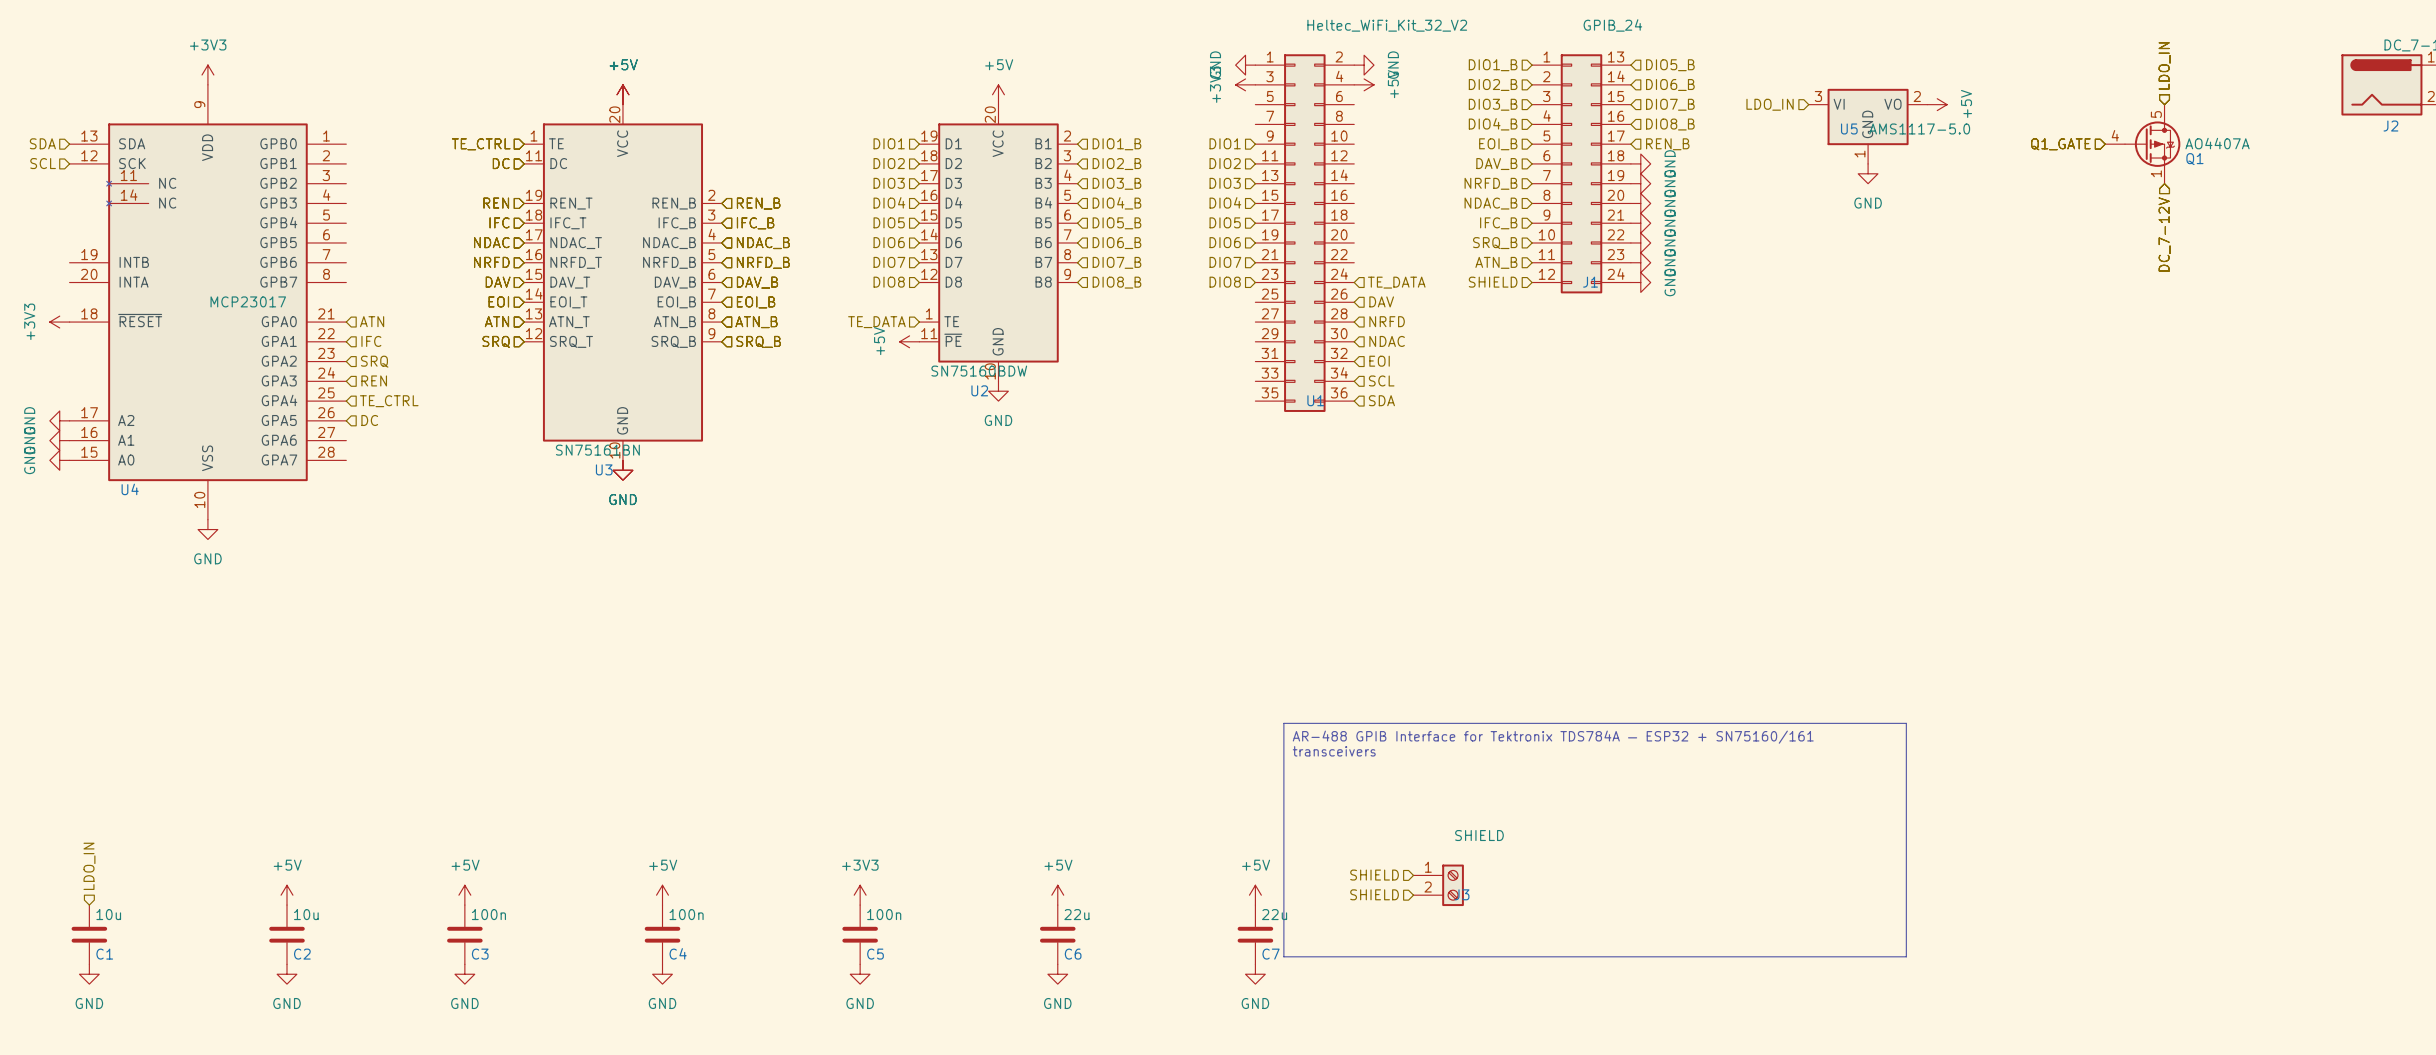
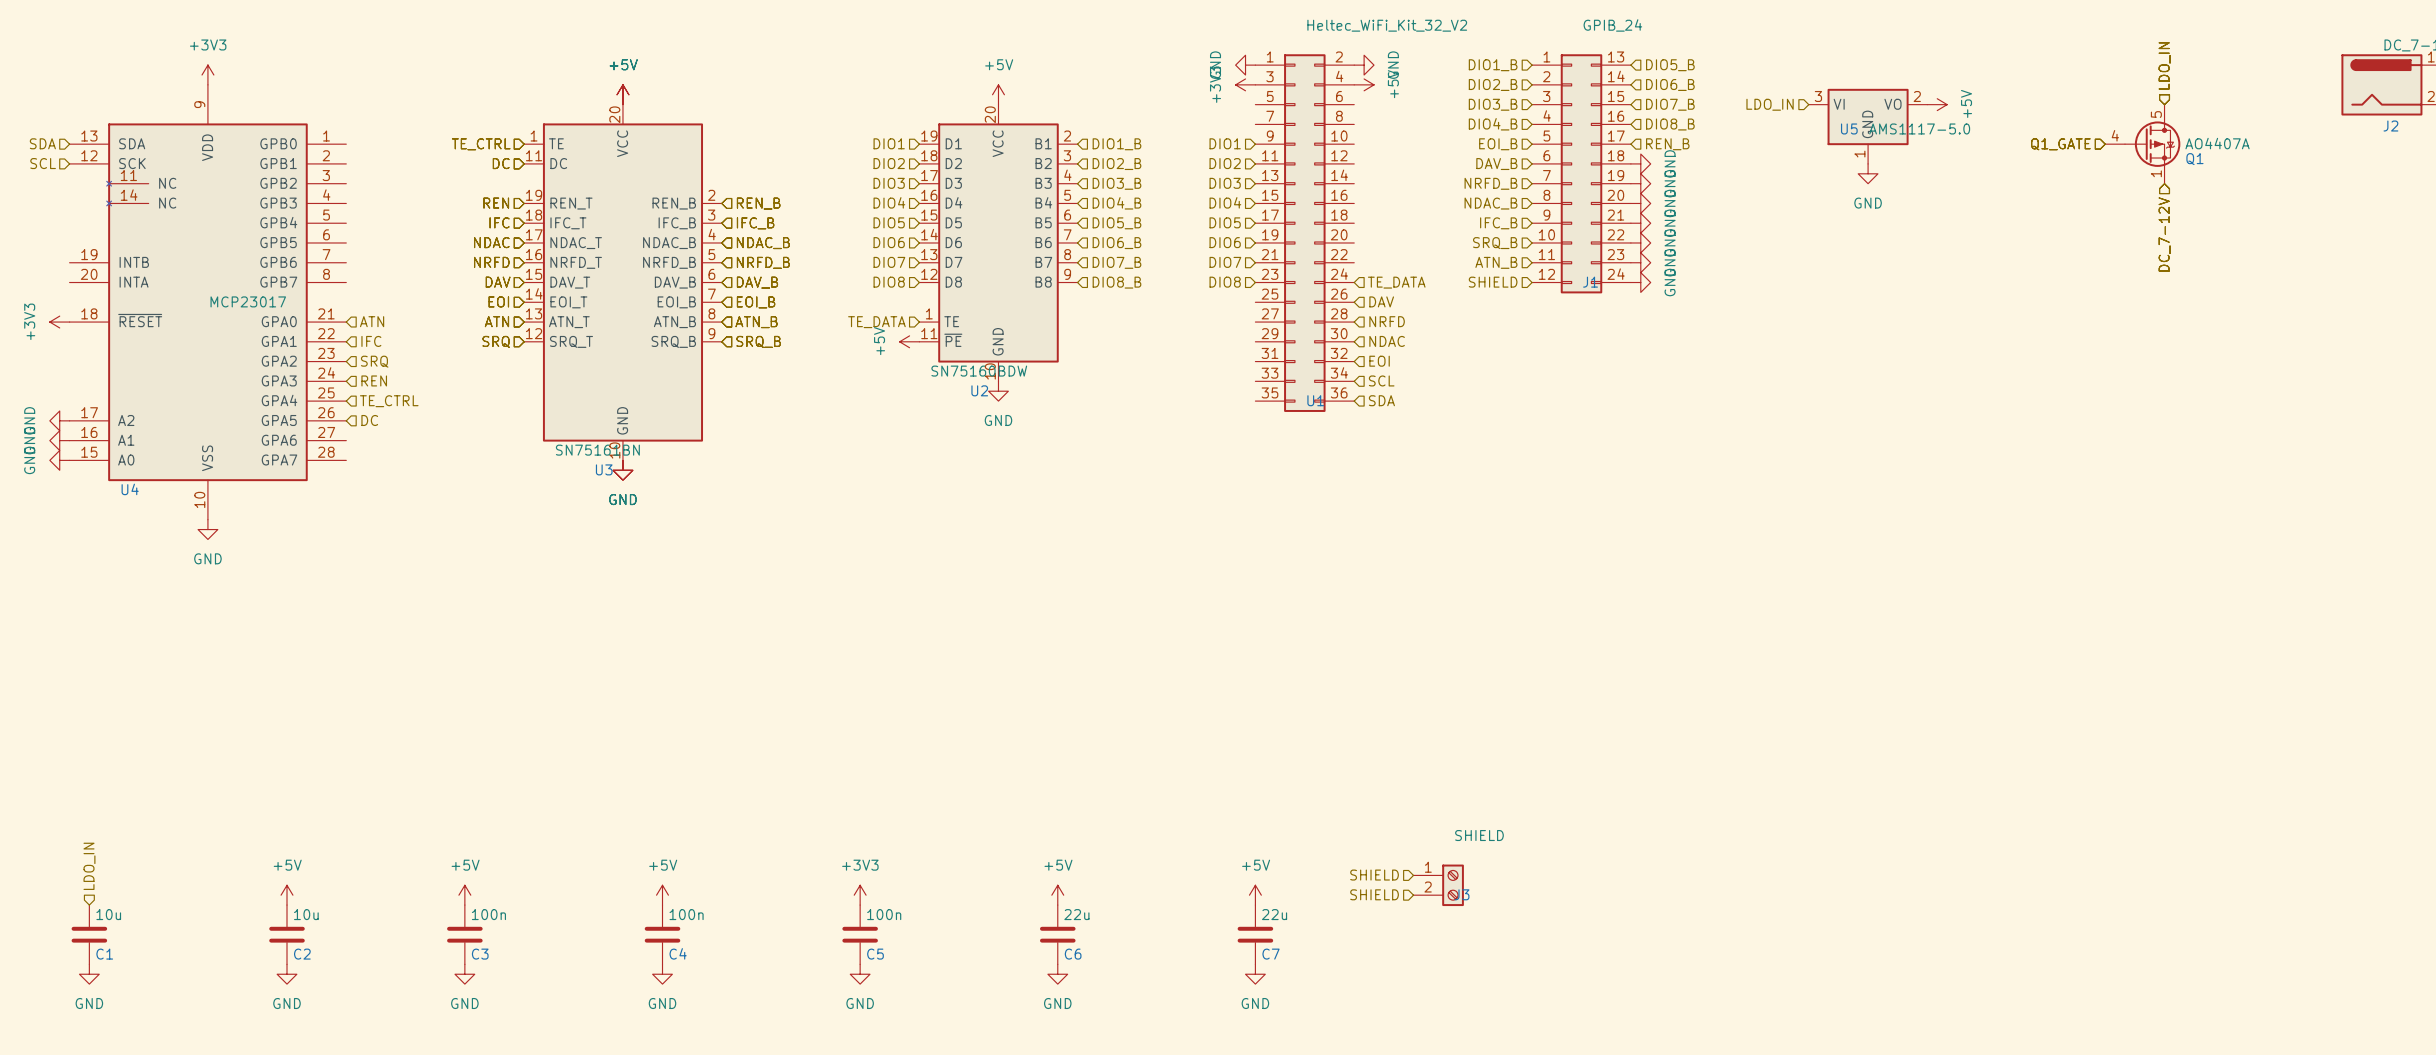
line: (1283, 723) (1906, 723) (1906, 956) (1283, 956) (1283, 723) -> none
text: AR-488 GPIB Interface for Tektronix TDS784A — ESP32 + SN75160/161 (1553, 737) -> none
text: transceivers (1334, 751) -> none

